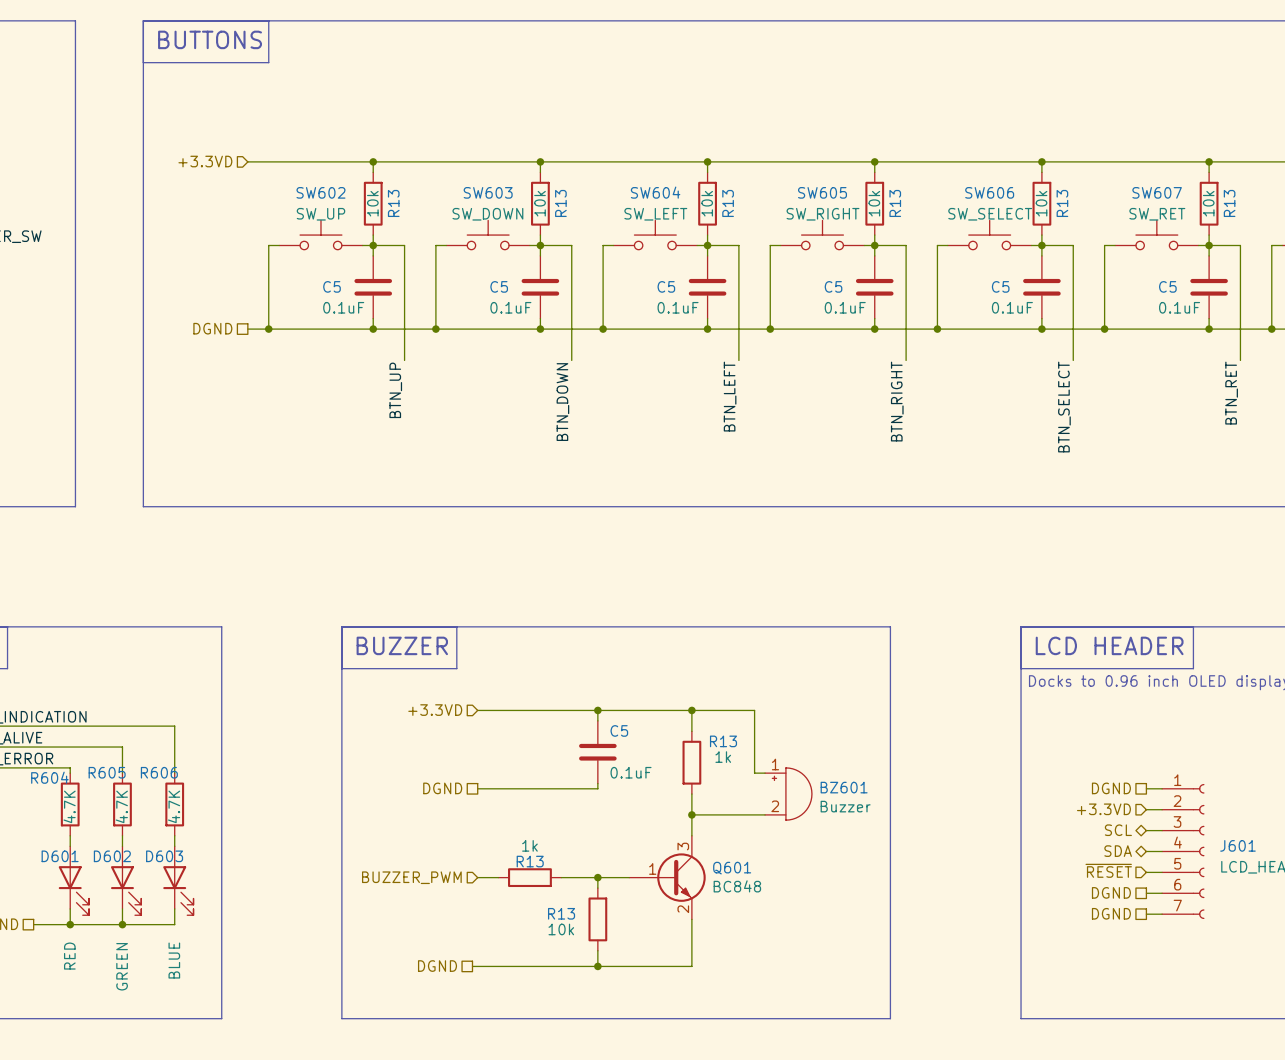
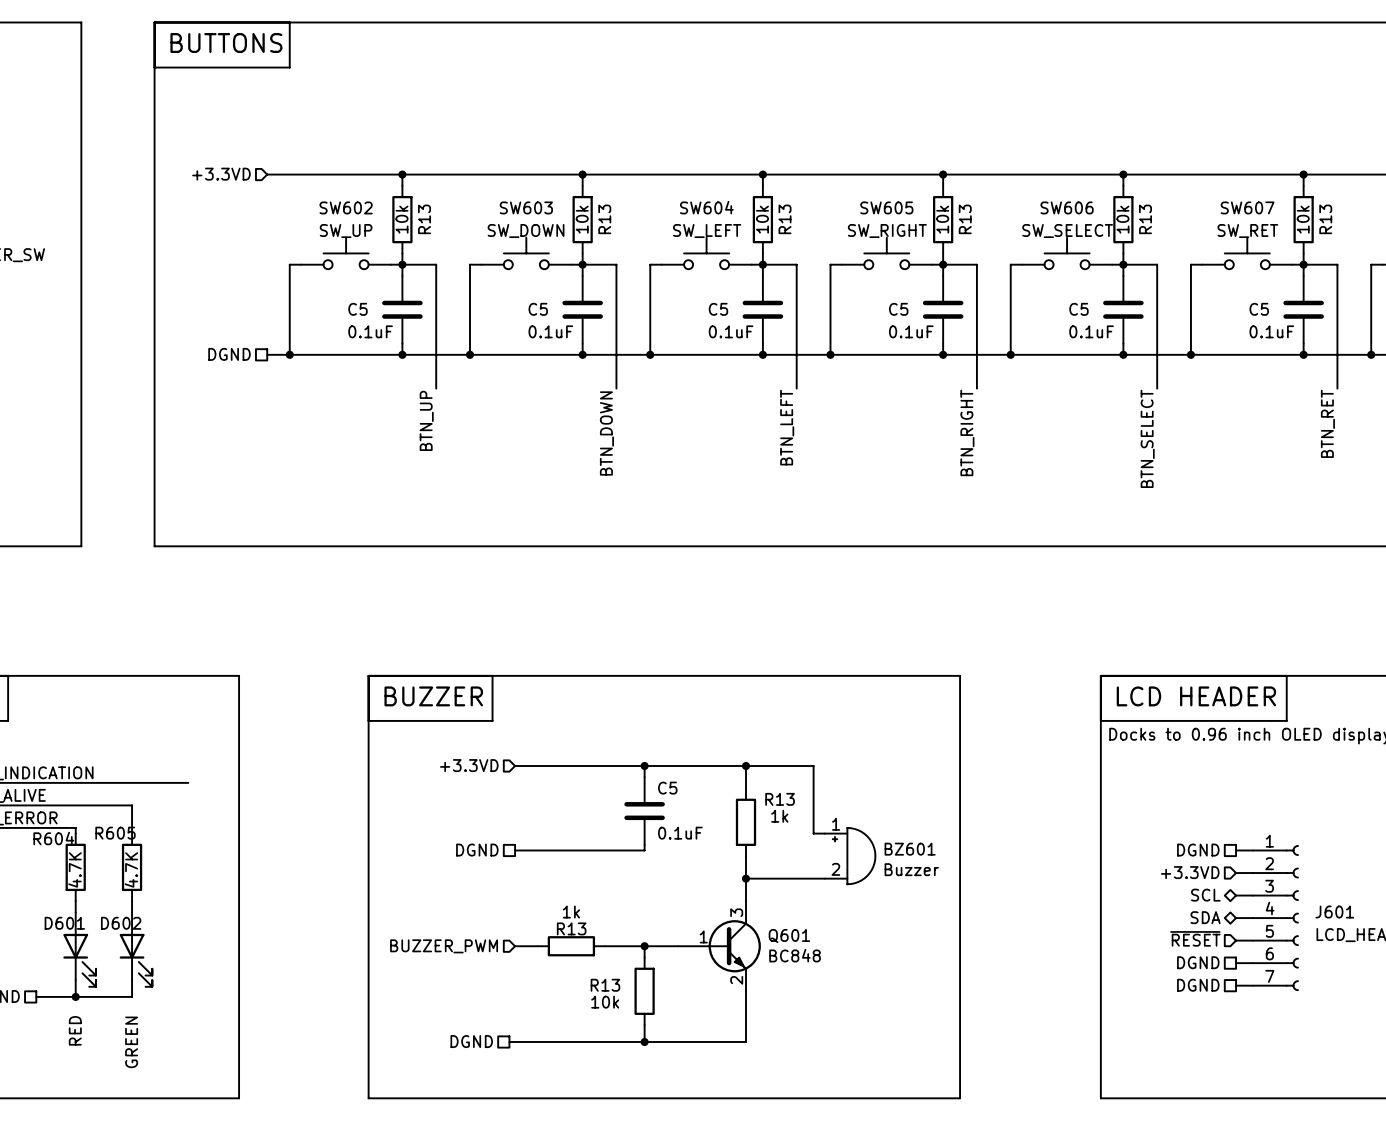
wire: (174, 726) (174, 773) -> none
R606: 4.7K (174, 804) -> none
wire: (174, 835) (174, 846) -> none
D603: BLUE (178, 880) -> none
wire: (174, 908) (174, 924) (122, 924) -> none
junction: (122, 924) -> none

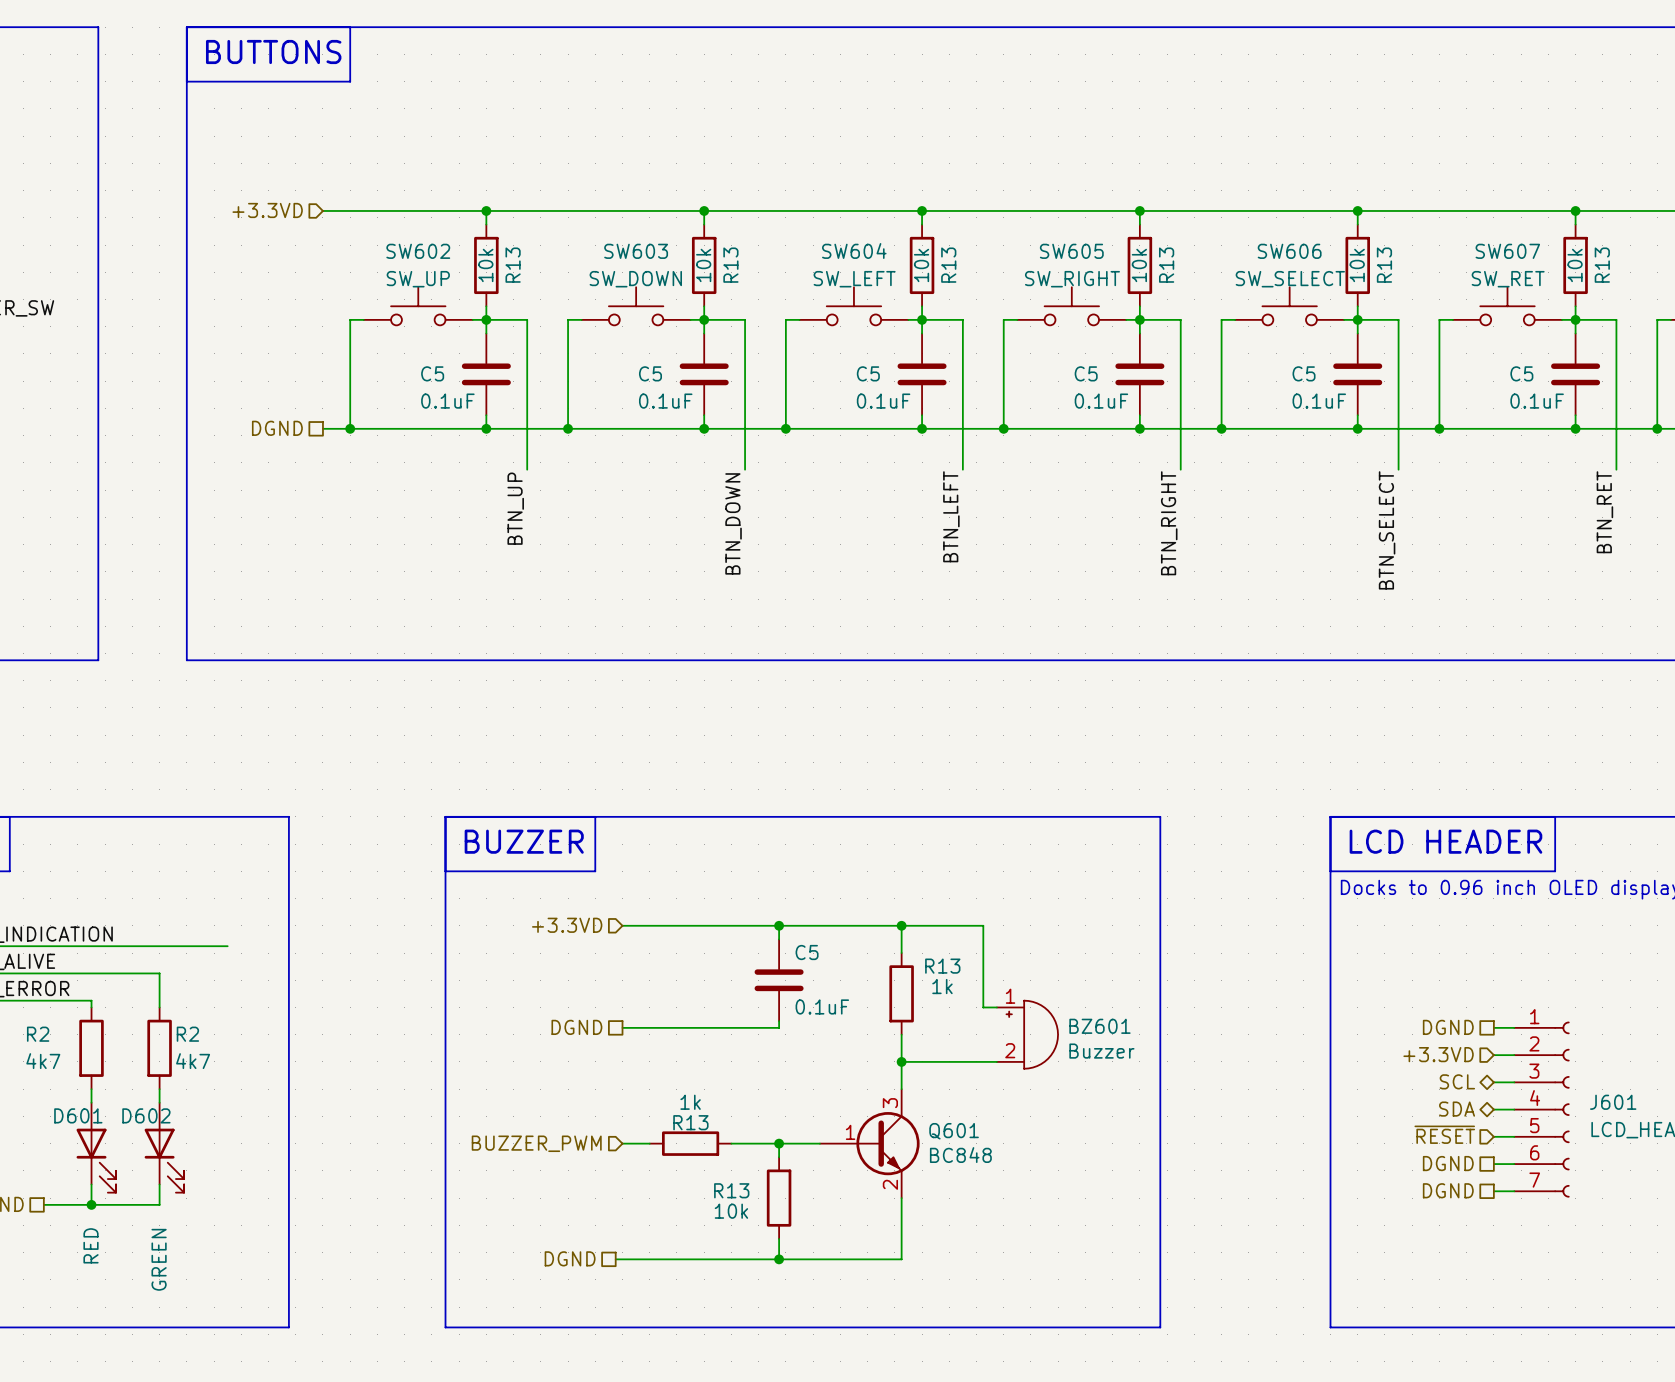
R605 name: R605 (115, 833) -> R2 (187, 1034)
R604 name: R604 (53, 838) -> R2 (38, 1034)
R604 value: 4.7K (75, 869) -> 4k7 (43, 1061)
R605 value: 4.7K (131, 869) -> 4k7 (193, 1061)

